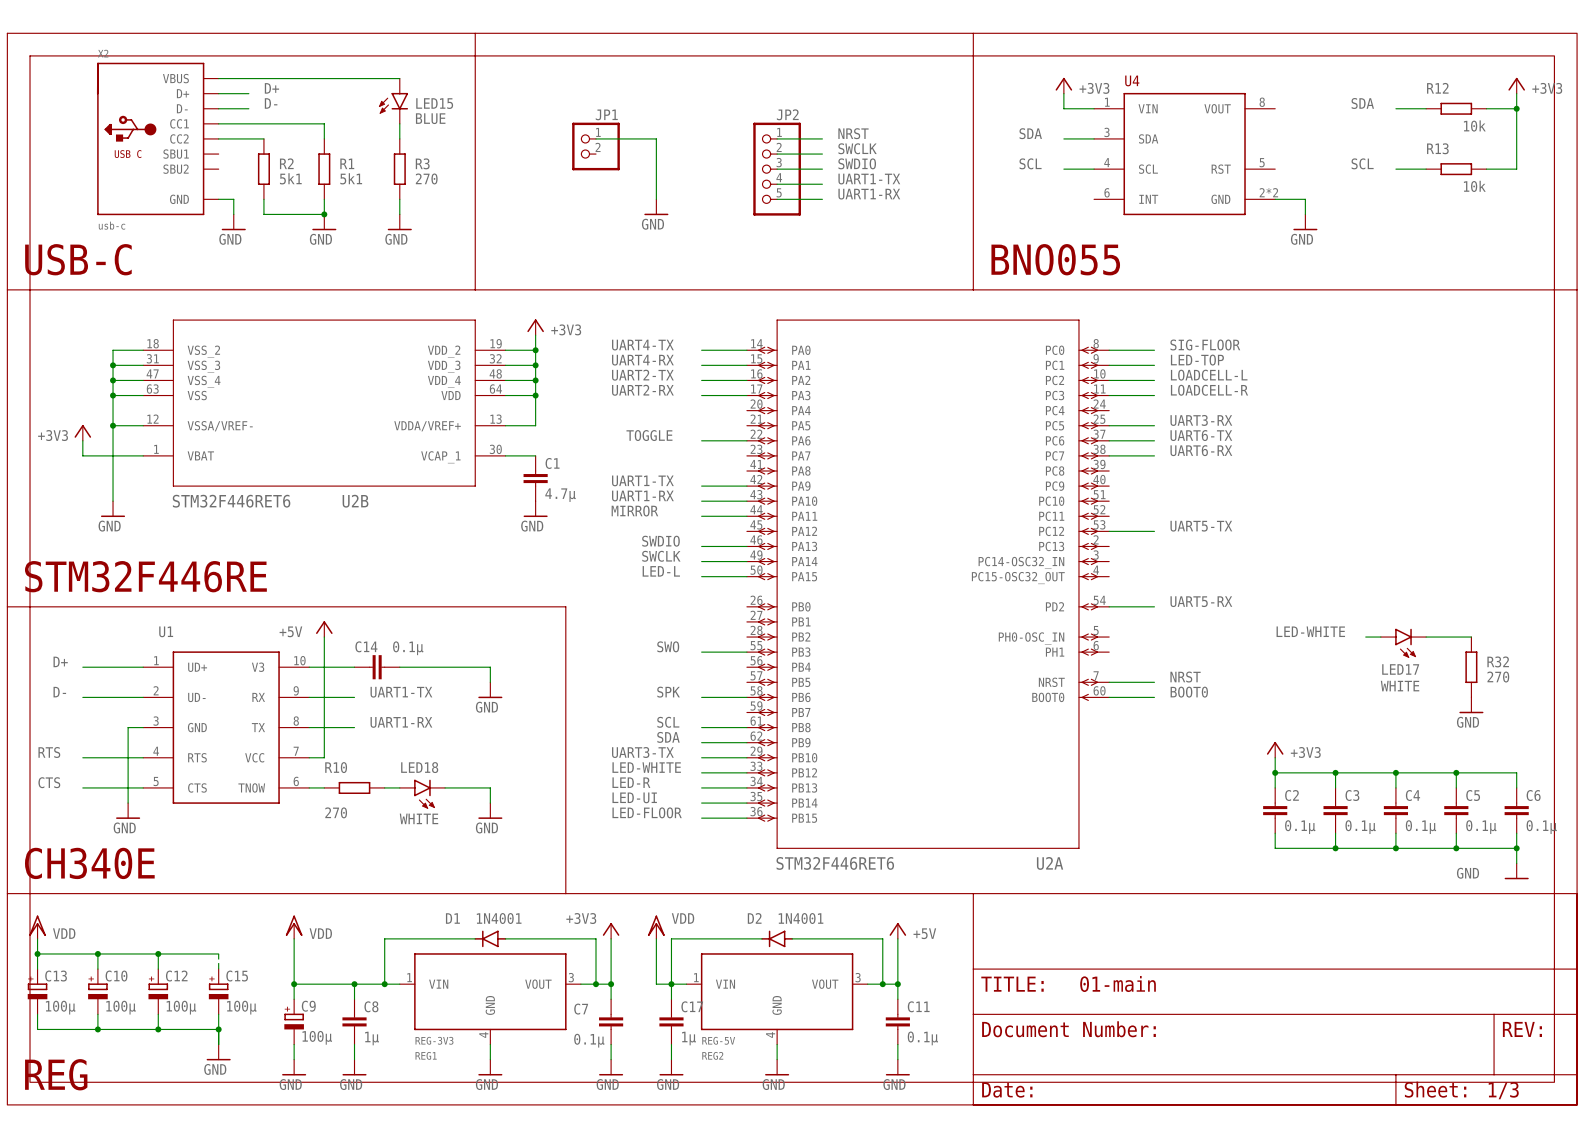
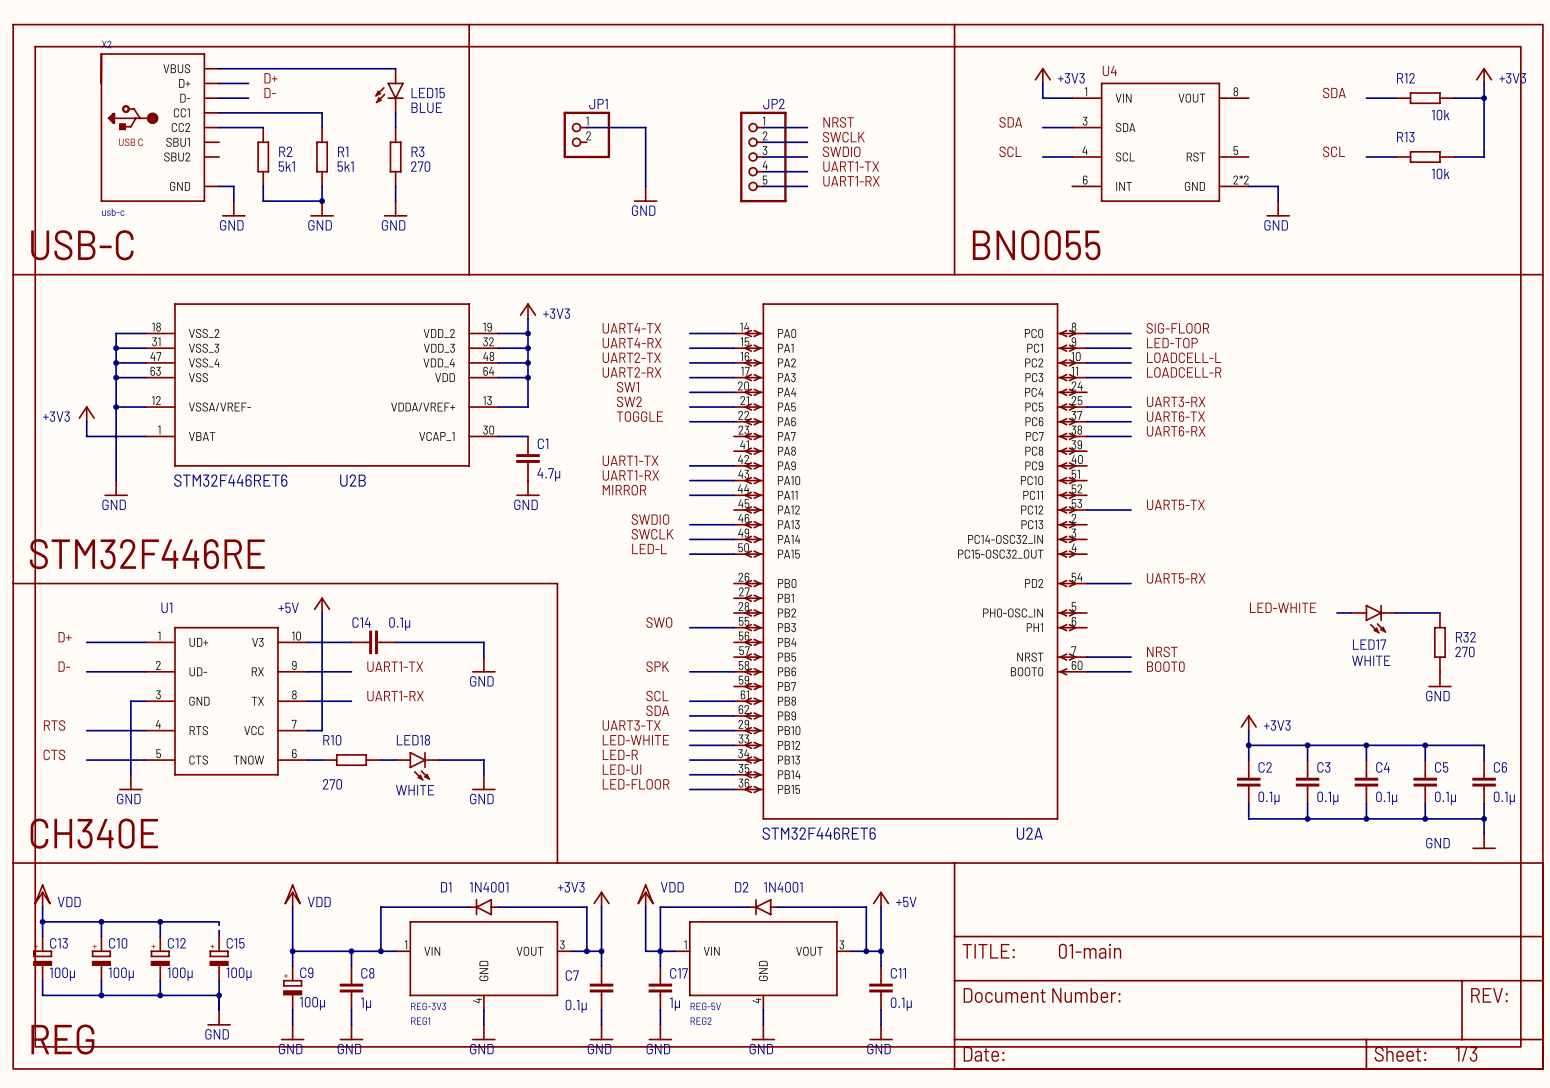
label: none -> SW1 (627, 387)
wire: none -> (689, 392) (733, 392)
label: none -> SW2 (629, 401)
wire: none -> (689, 407) (733, 407)

